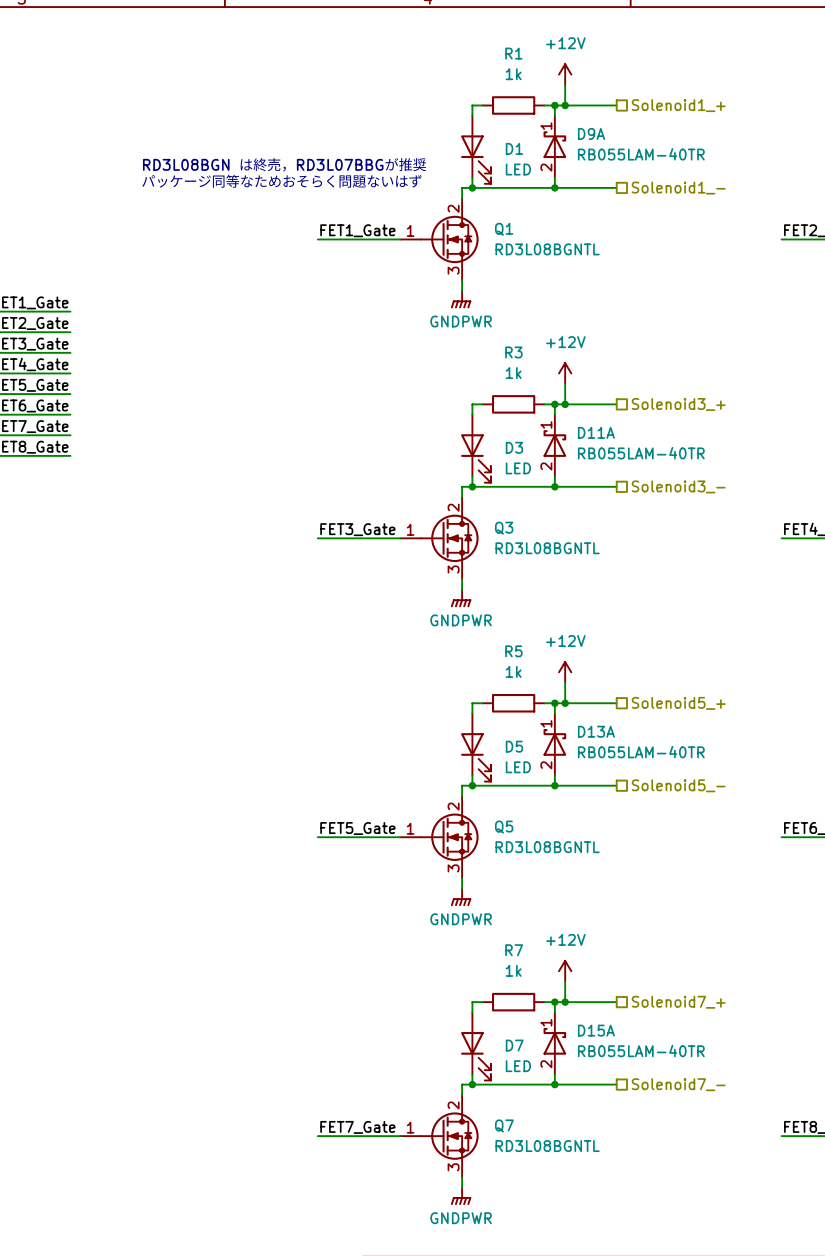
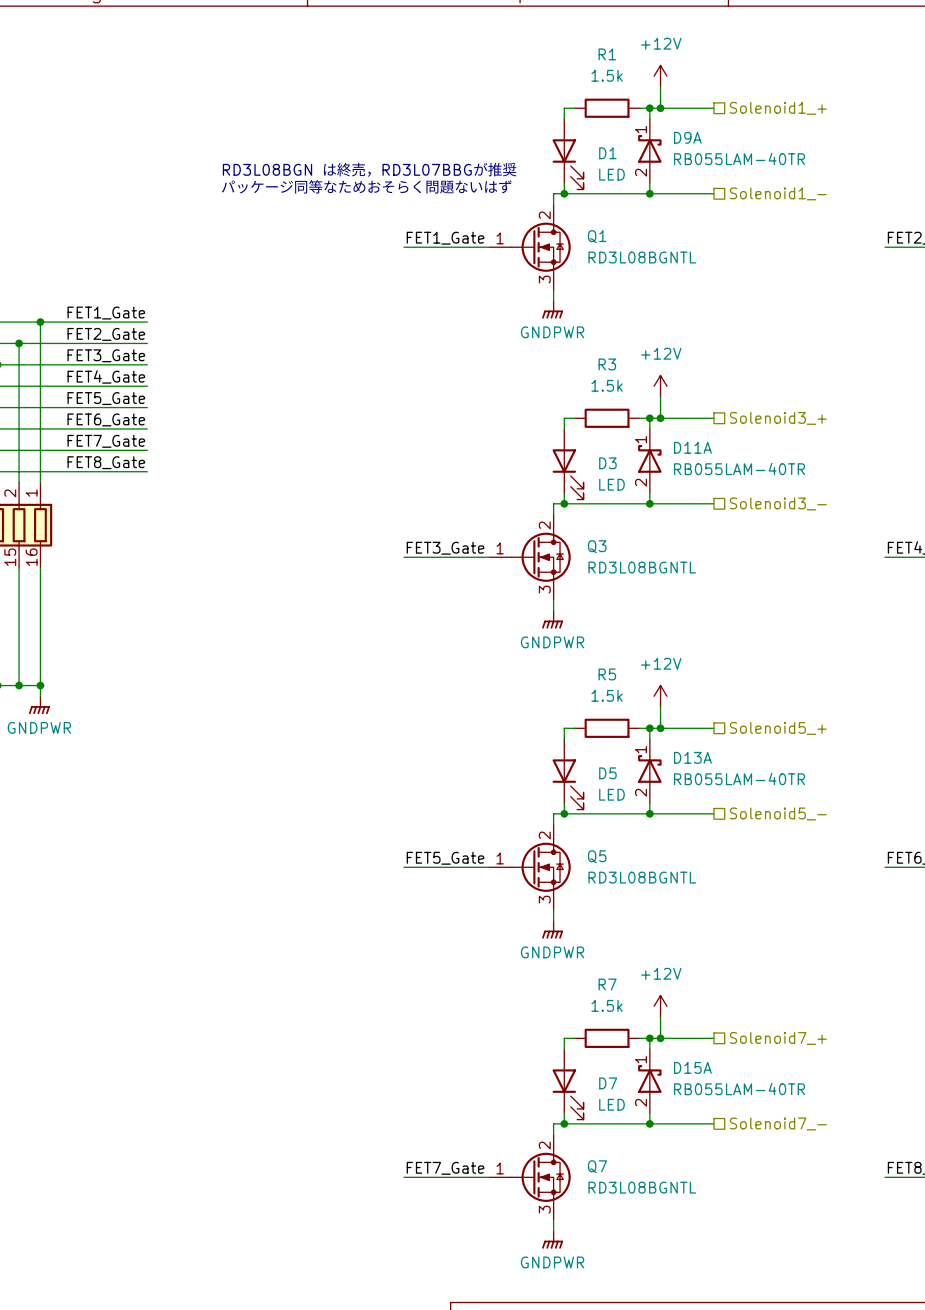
R1 value: 1k (513, 74) -> 1.5k (607, 75)
R3 value: 1k (513, 373) -> 1.5k (607, 385)
R5 value: 1k (513, 671) -> 1.5k (607, 695)
R7 value: 1k (513, 970) -> 1.5k (607, 1005)

